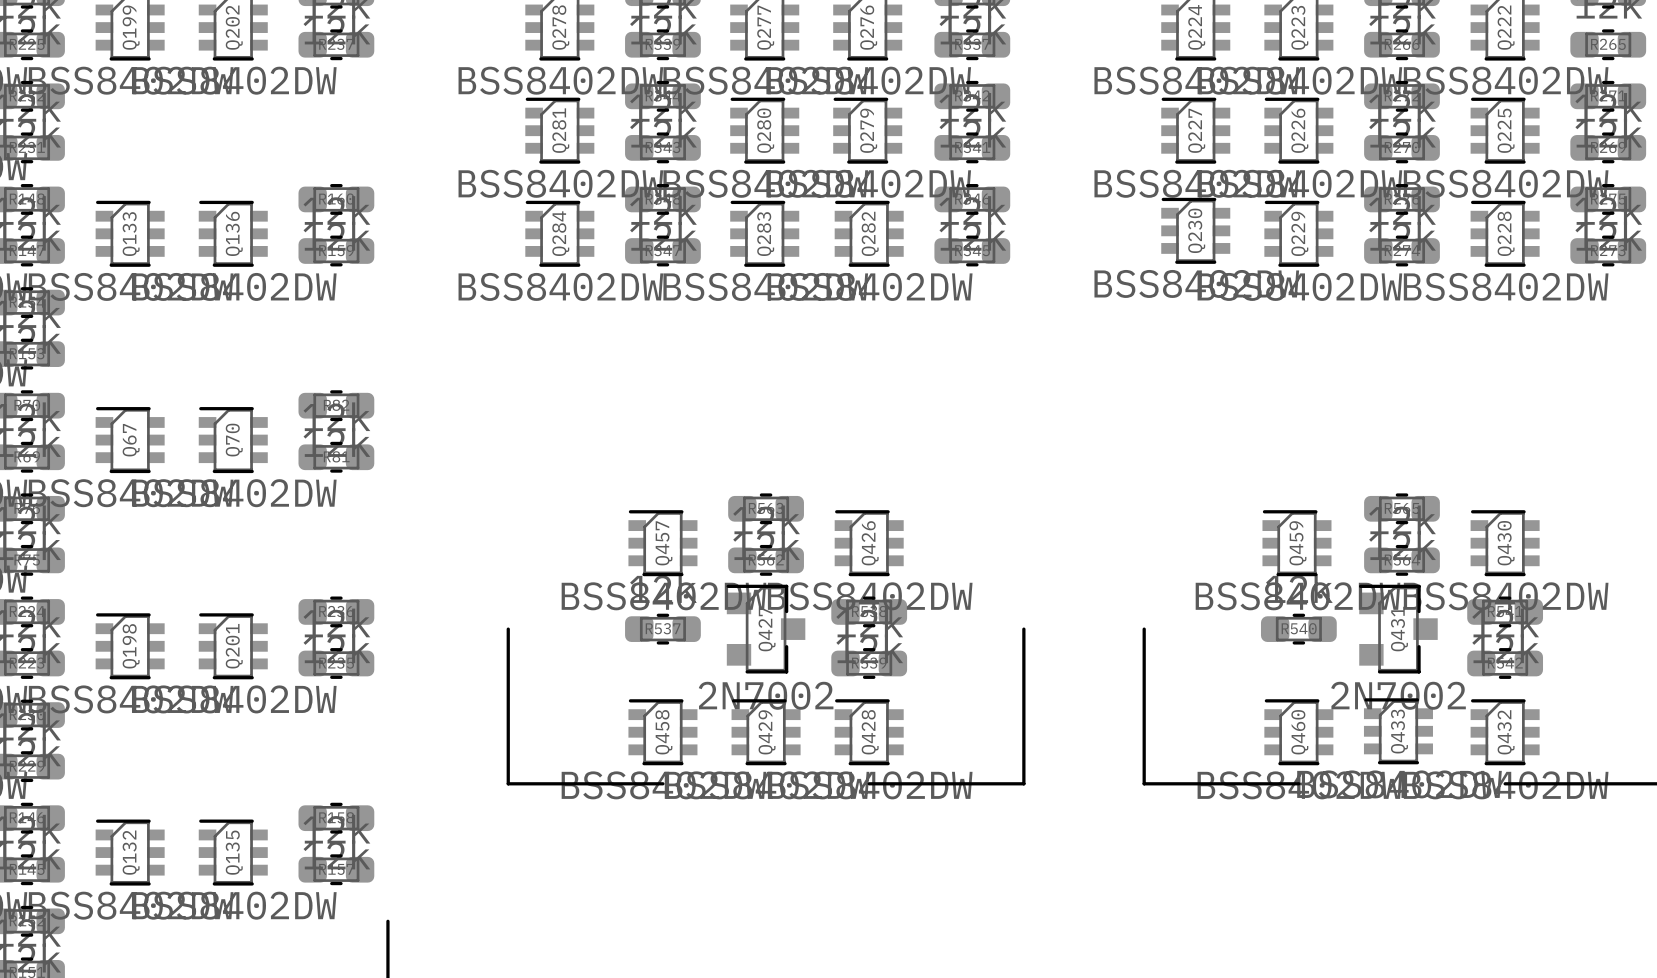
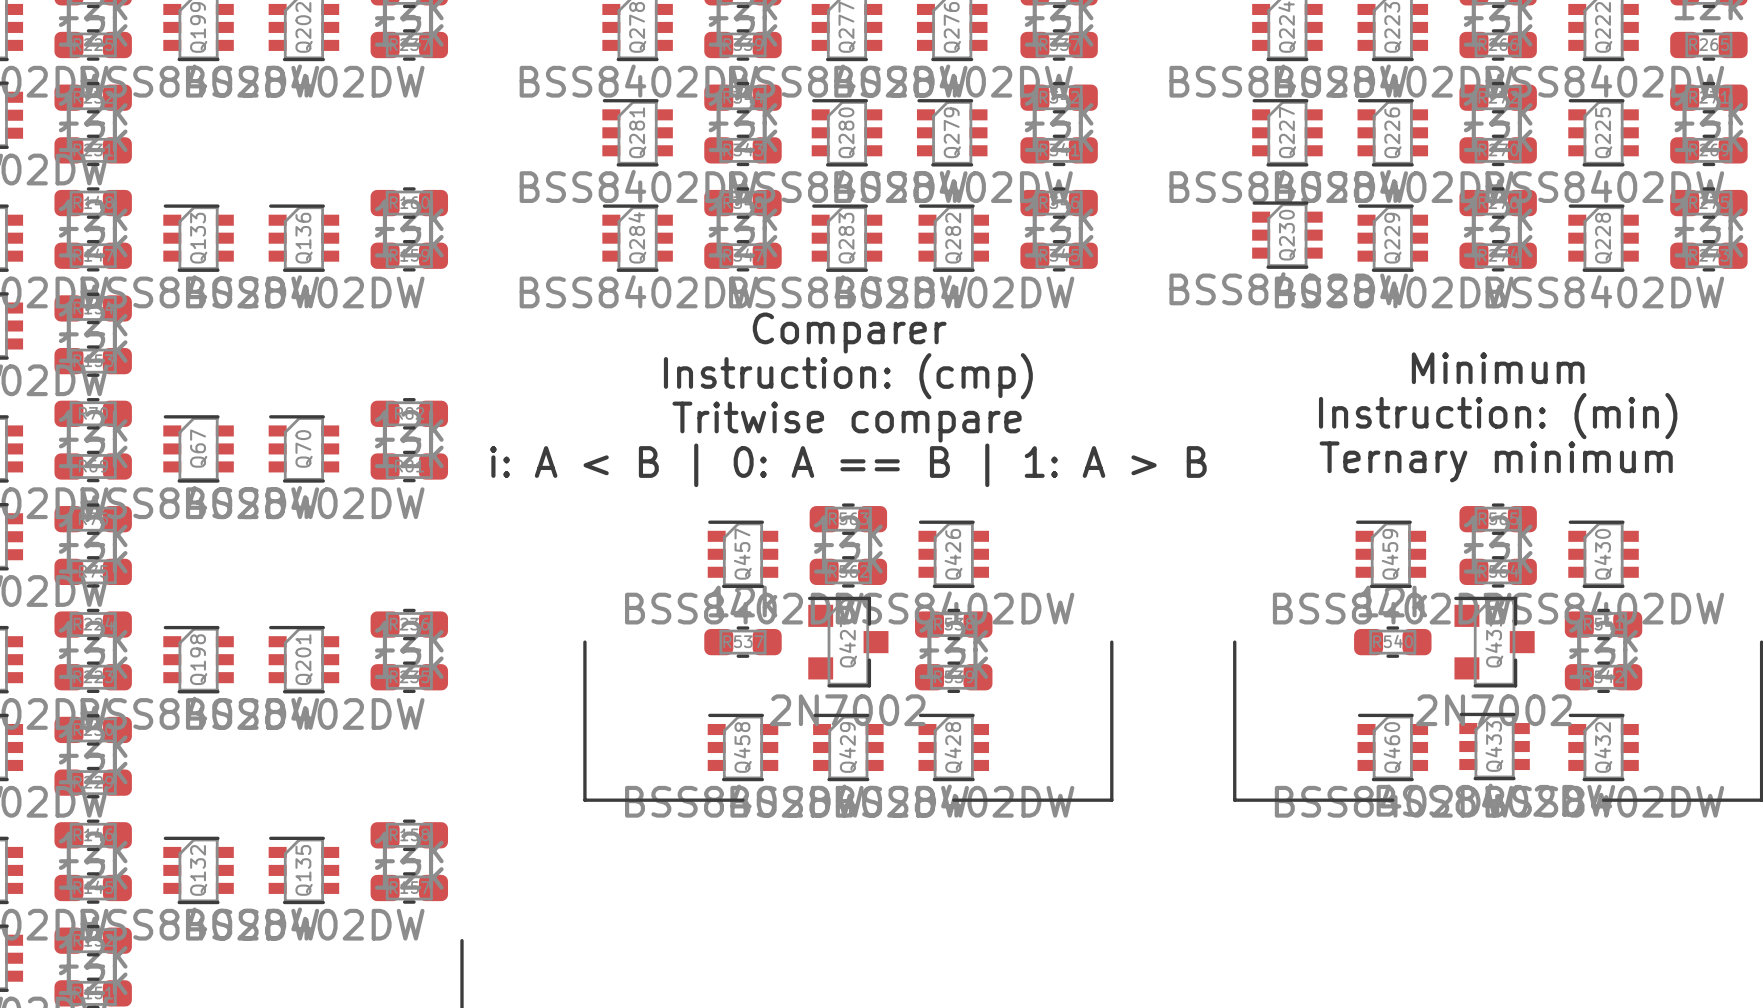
text: none -> Comparer (849, 333)
text: none -> Minimum (1498, 368)
text: none -> Instruction: (cmp) (848, 376)
text: none -> Instruction: (min) (1498, 416)
text: none -> Tritwise compare (847, 422)
text: none -> Ternary minimum (1496, 461)
text: none -> i: A < B | 0: A == B | 1: A > B (848, 465)

